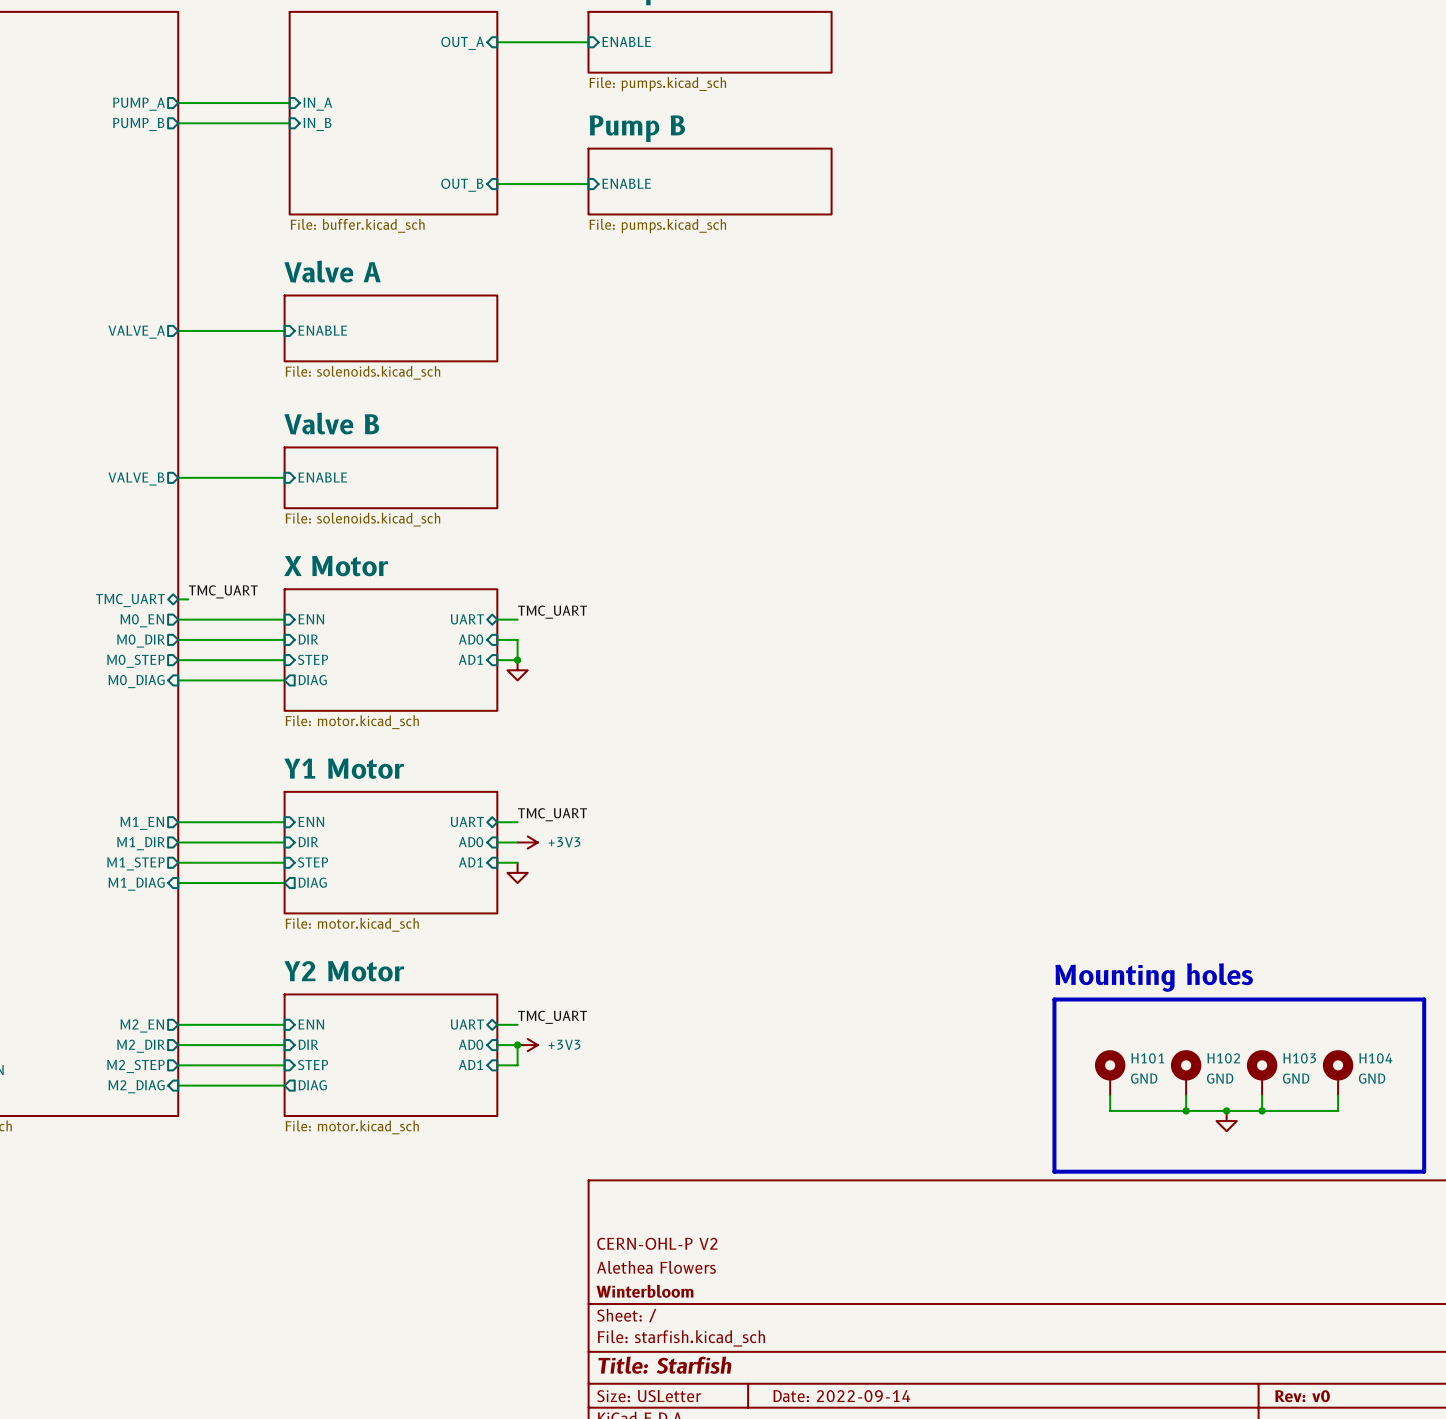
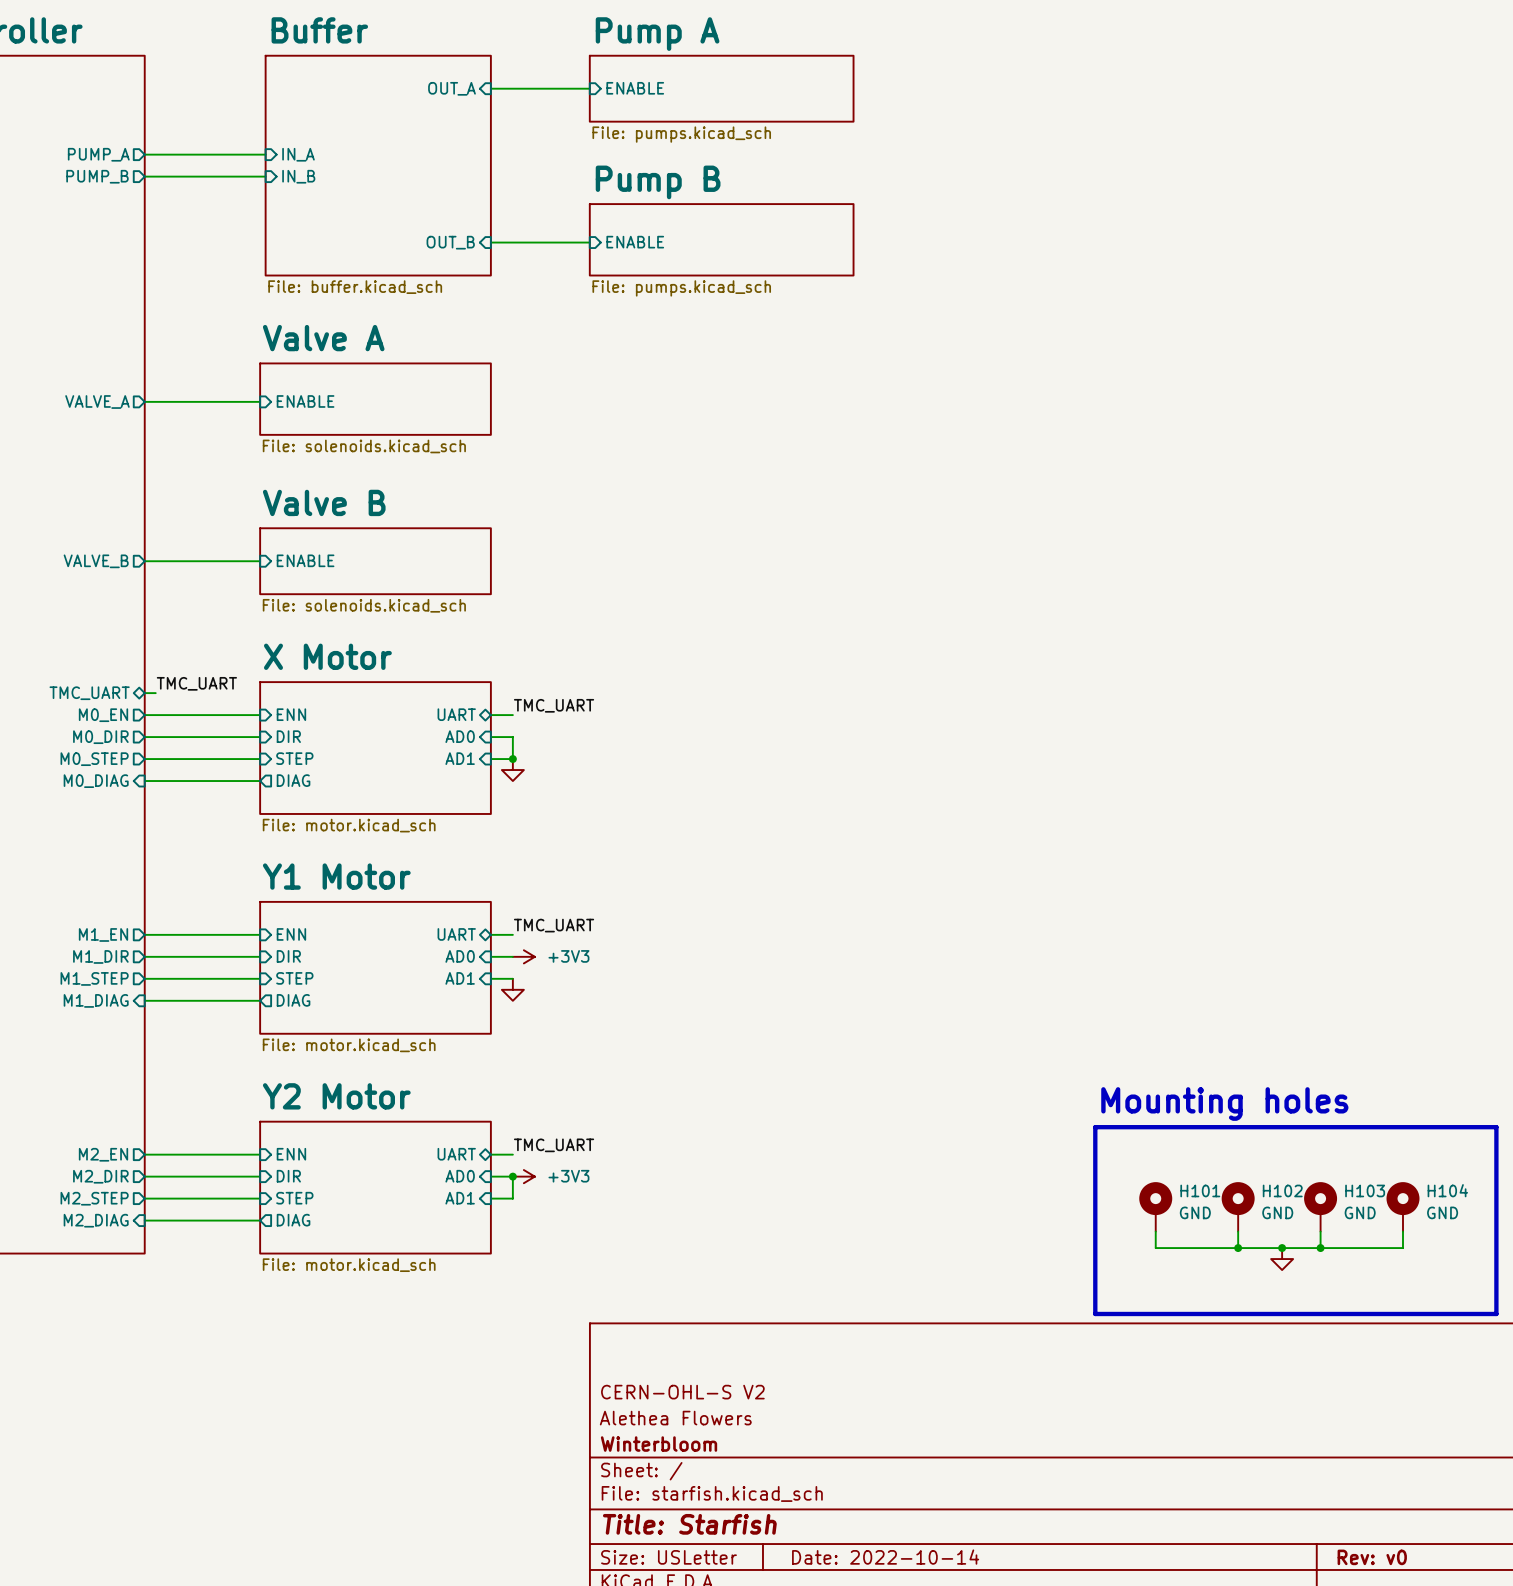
title block: CERN-OHL-P V2 (657, 1243) -> CERN-OHL-S V2 (682, 1392)
title block: Date: 2022-09-14 (841, 1396) -> Date: 2022-10-14 (885, 1557)

